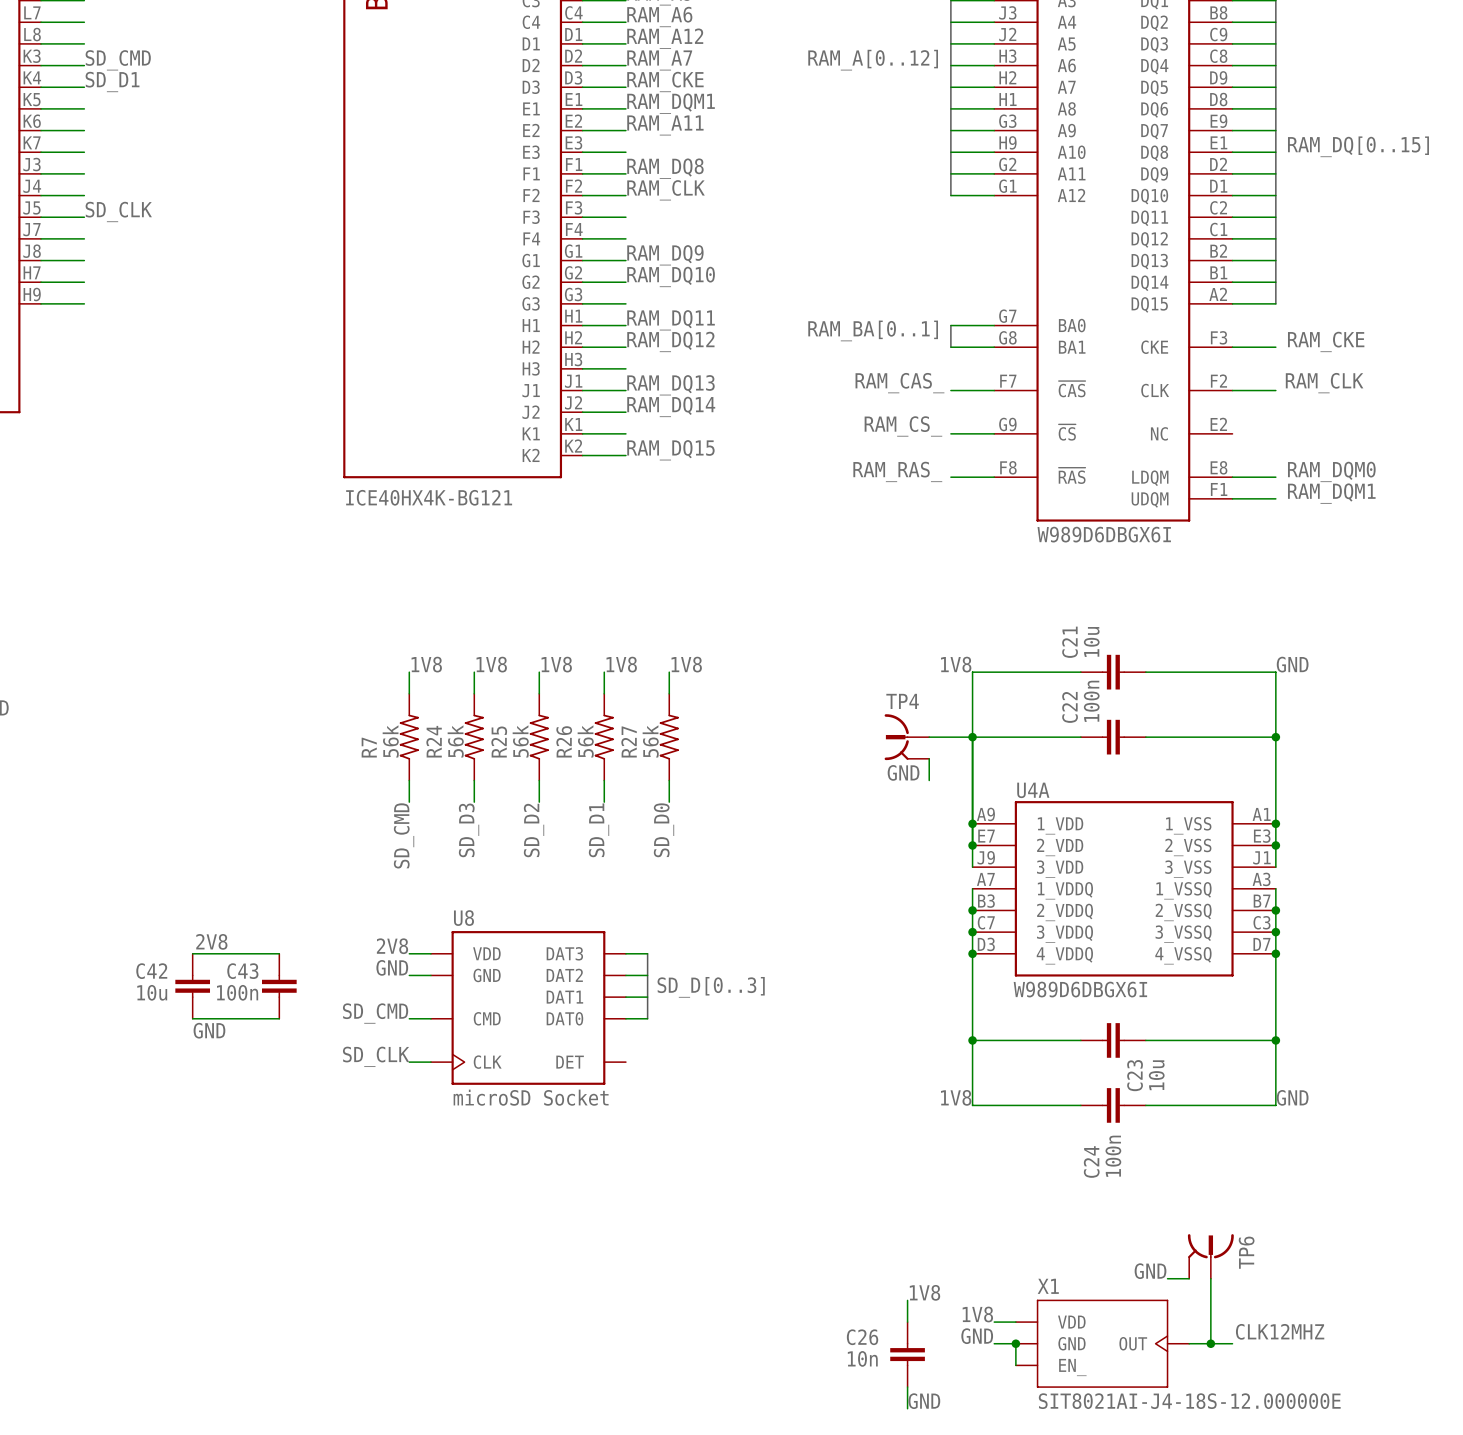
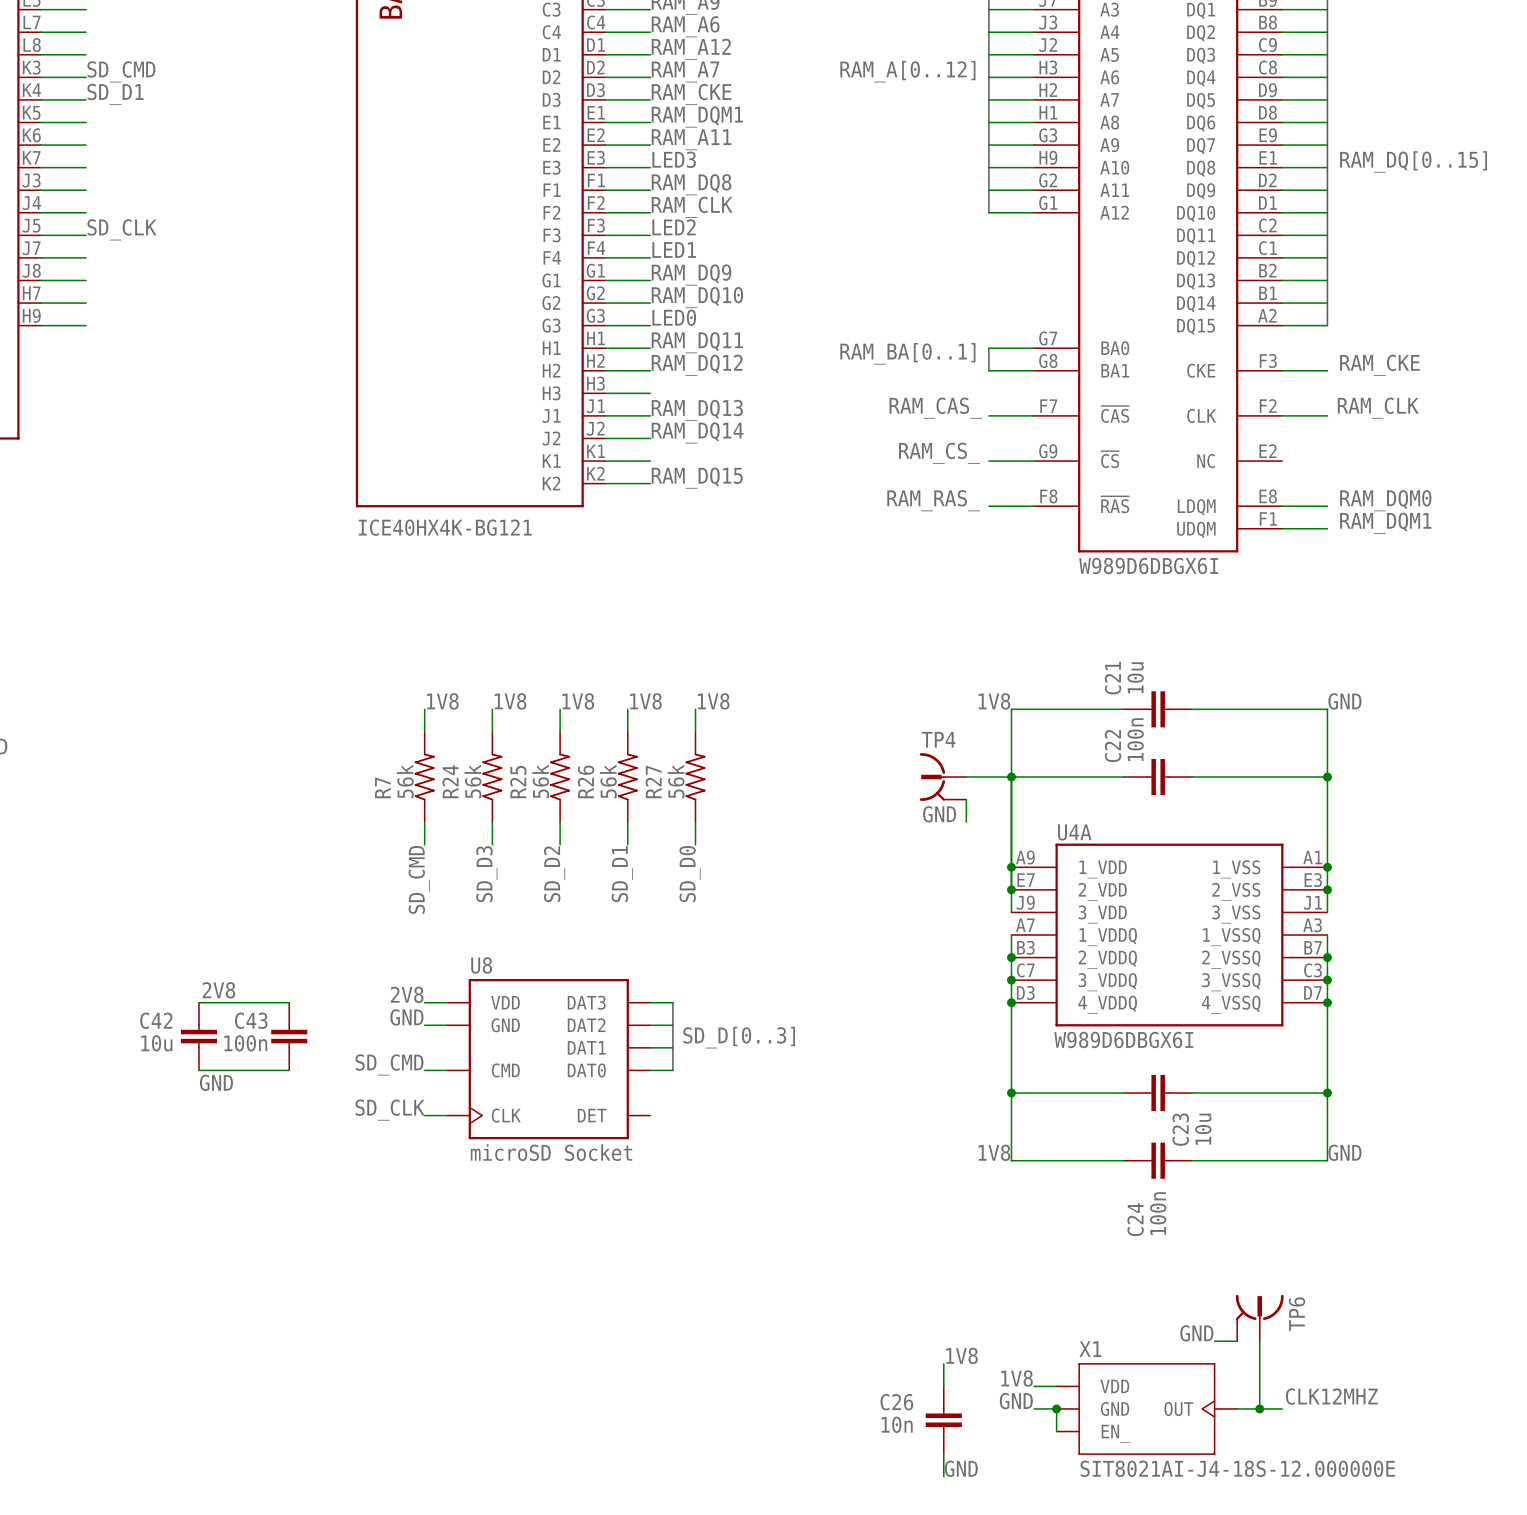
label: none -> LED3 (674, 159)
label: none -> LED2 (674, 227)
label: none -> LED1 (674, 250)
label: none -> LED0 (674, 317)

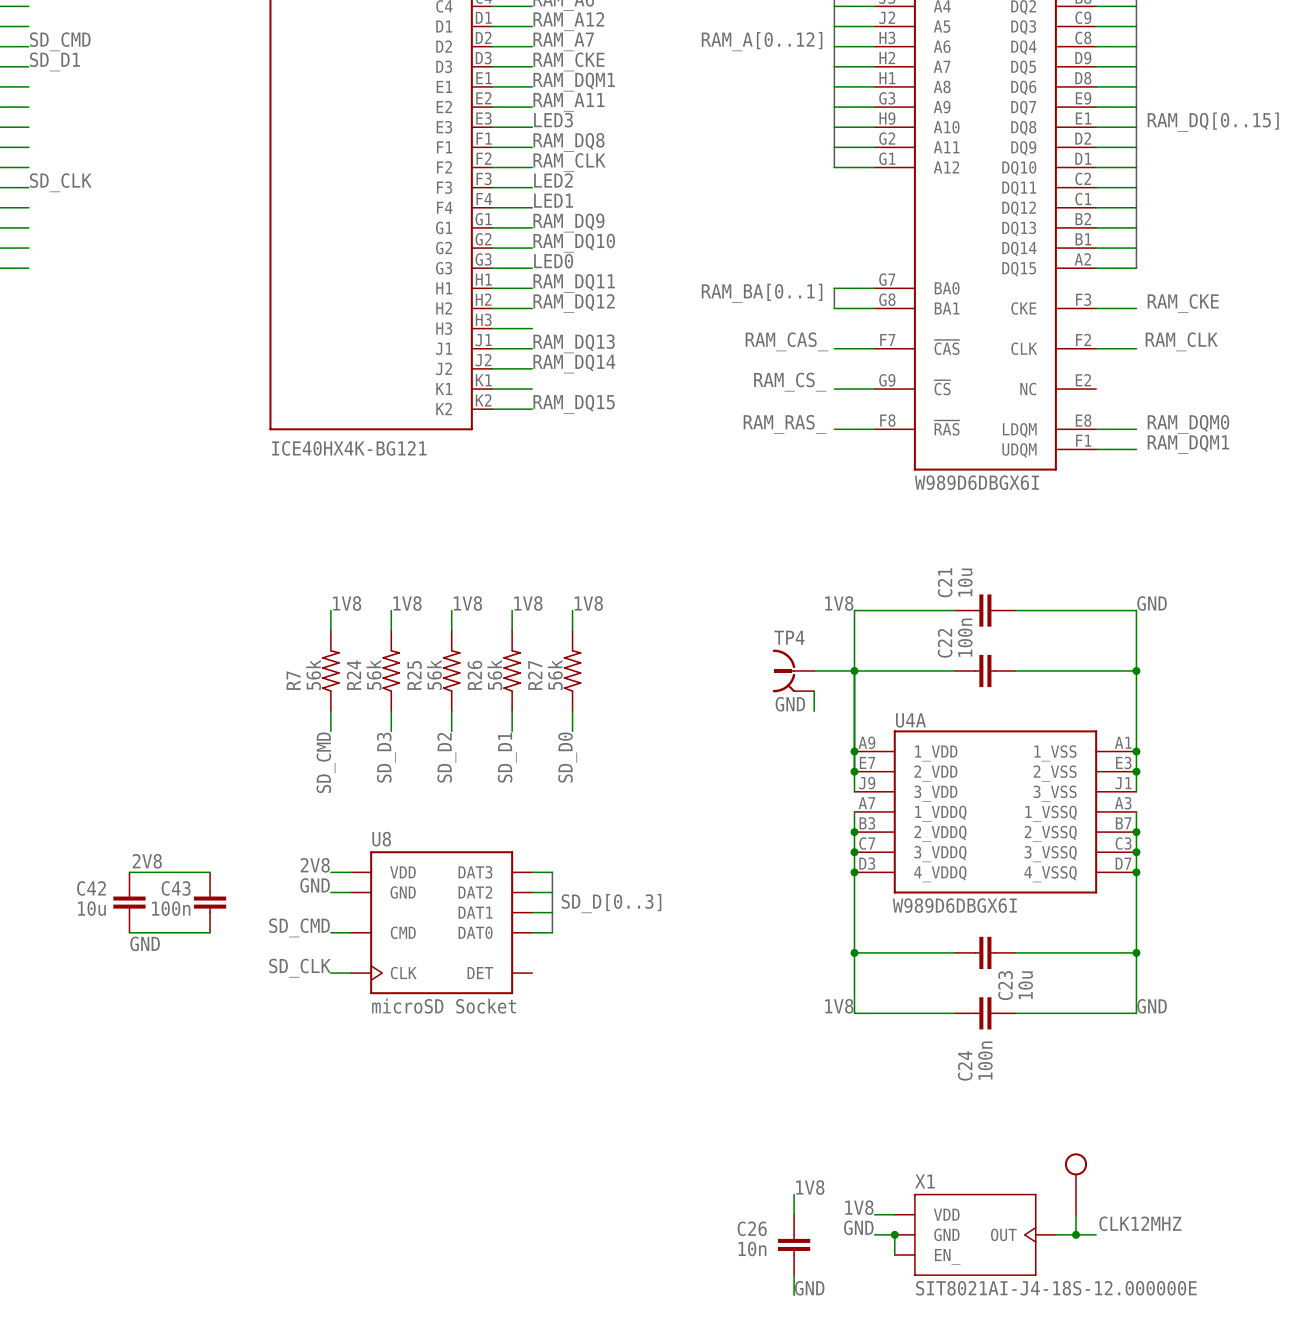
TP6: (1259, 1318) -> none
label: GND (1196, 1333) -> none
wire: (1214, 1341) (1237, 1341) -> none
part: none -> (1076, 1184)

